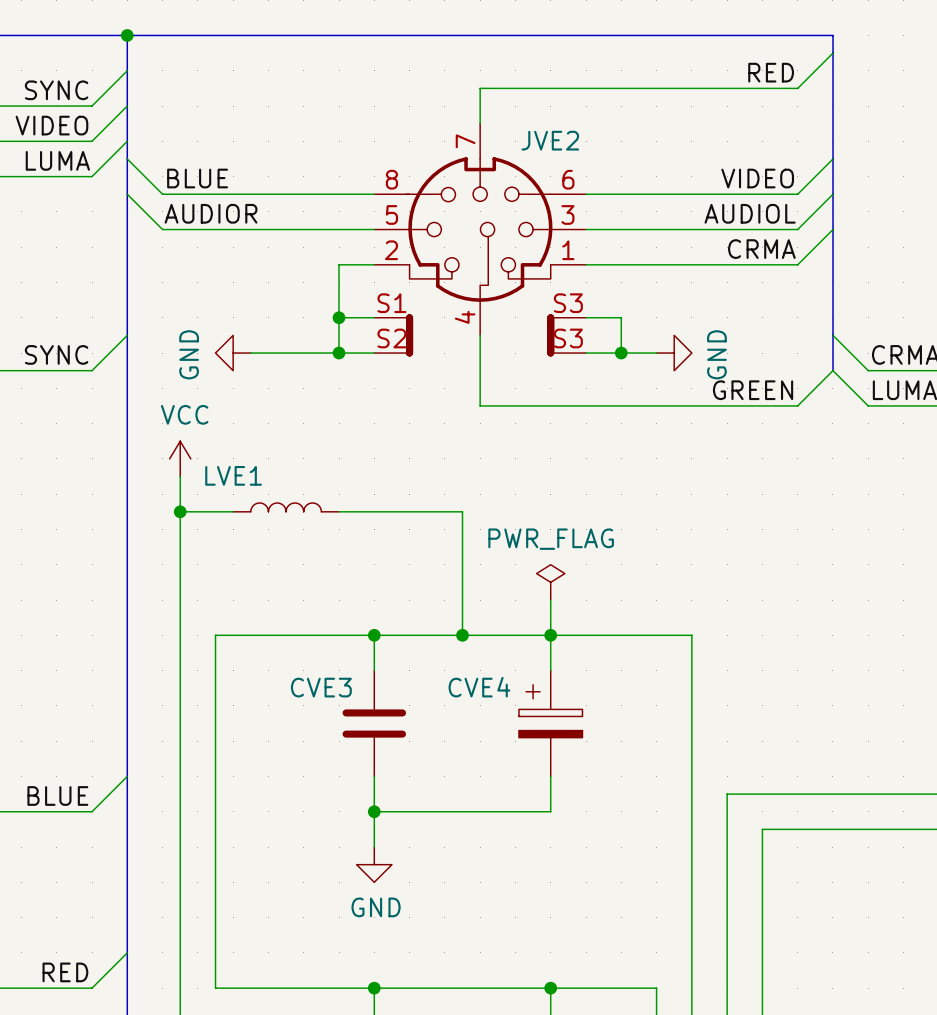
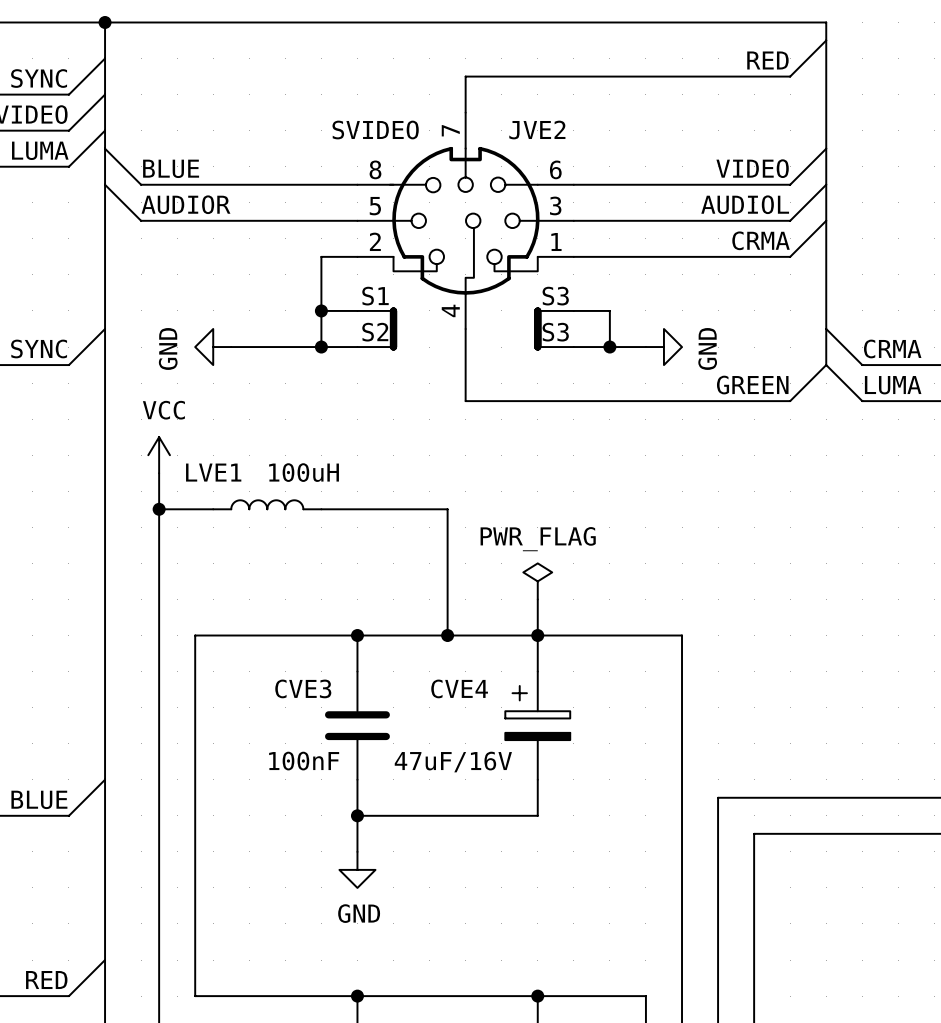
JVE2 value: none -> SVIDEO (375, 130)
LVE1 value: none -> 100uH (304, 472)
CVE3 value: none -> 100nF (304, 761)
CVE4 value: none -> 47uF/16V (453, 762)

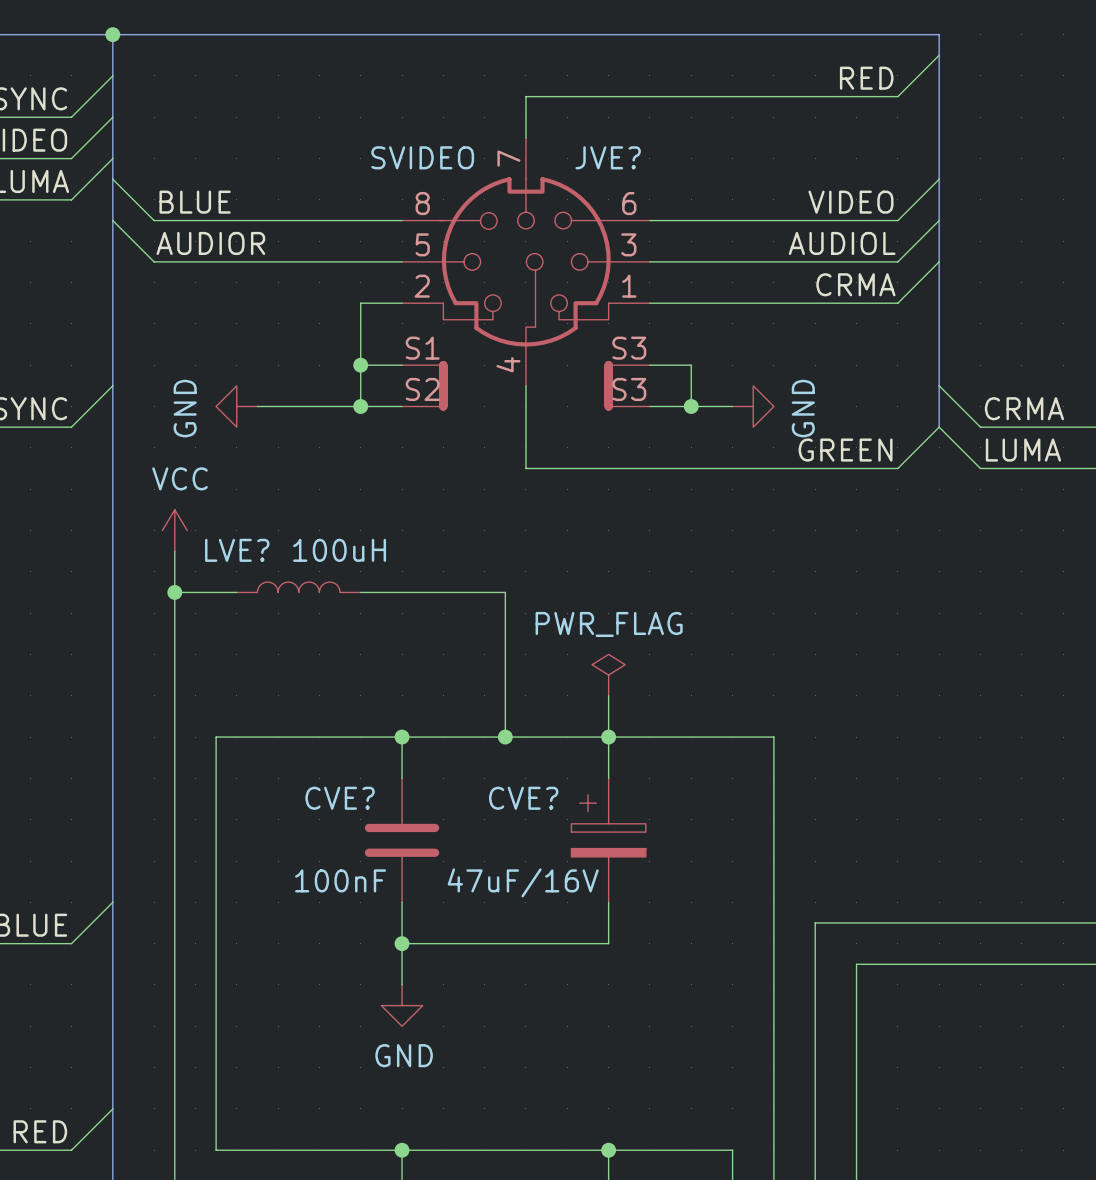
JVE2 name: JVE2 (537, 130) -> JVE? (608, 157)
LVE1 name: LVE1 (213, 472) -> LVE? (237, 550)
CVE3 name: CVE3 (303, 688) -> CVE? (340, 798)
CVE4 name: CVE4 (459, 688) -> CVE? (523, 798)

